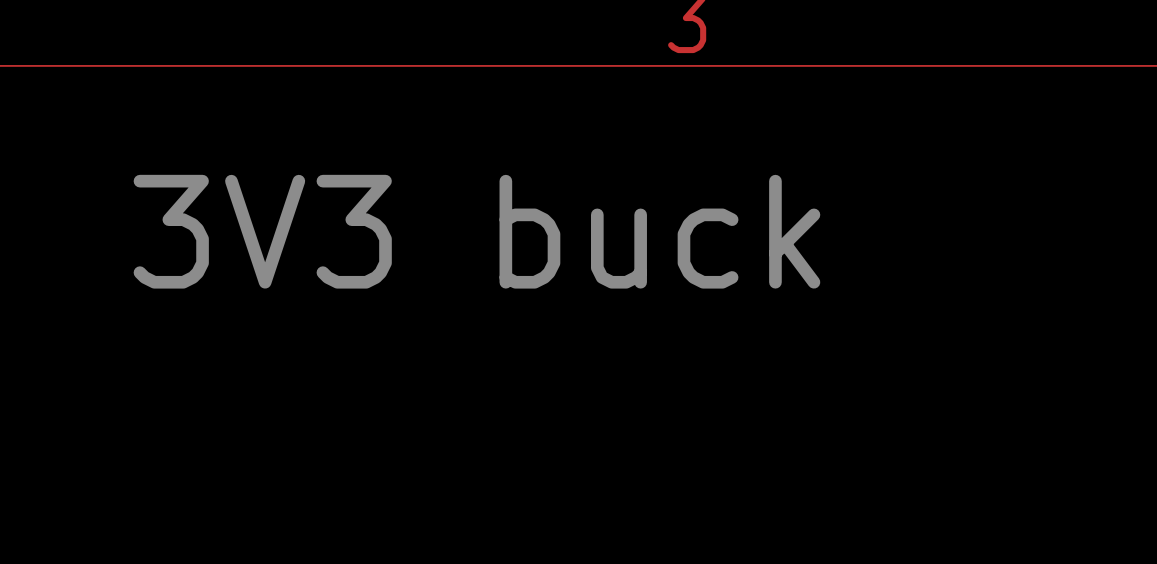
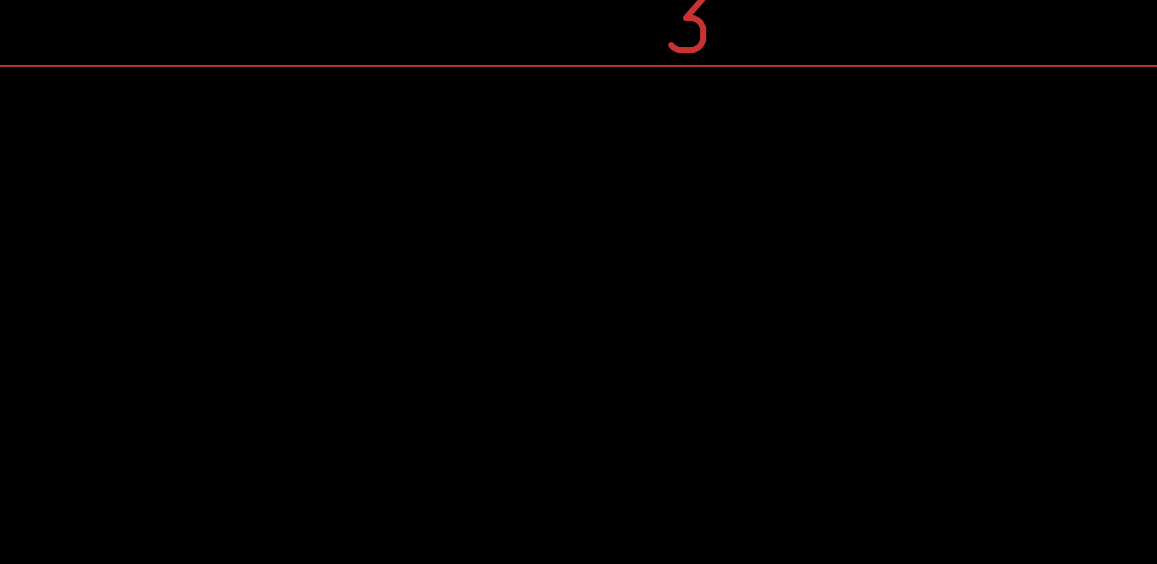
text: 3V3 buck (476, 231) -> none

